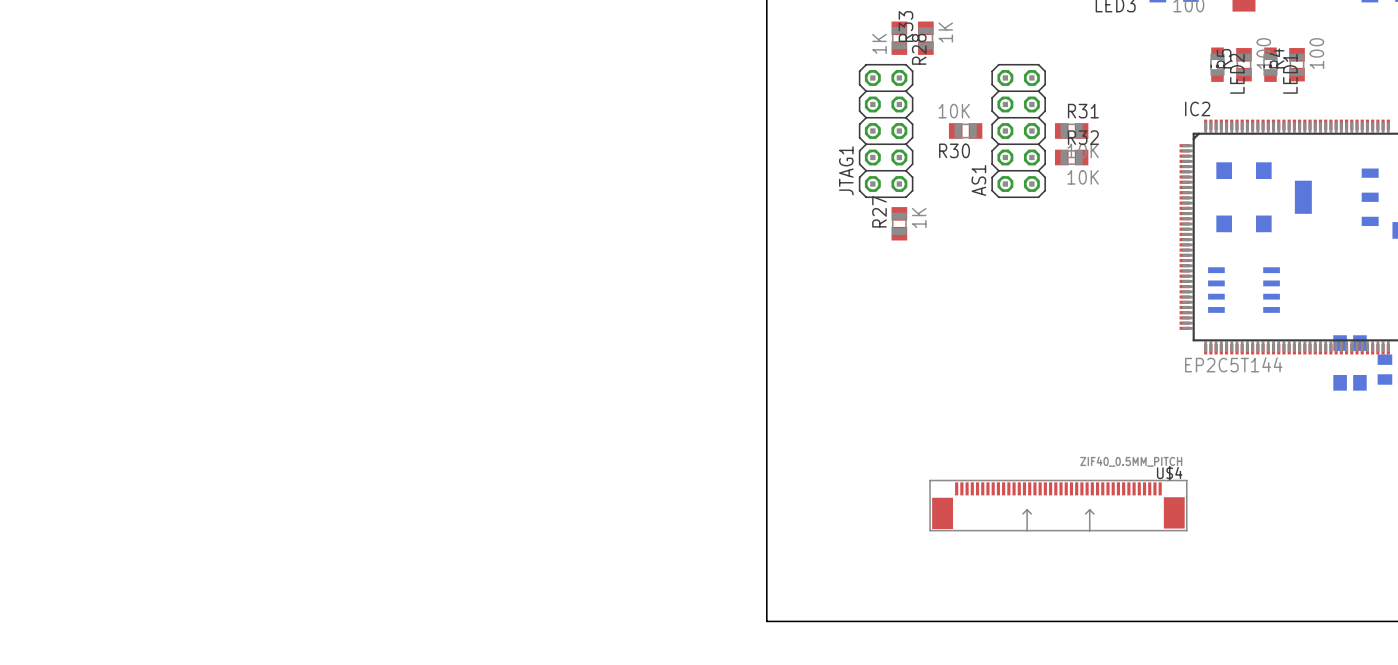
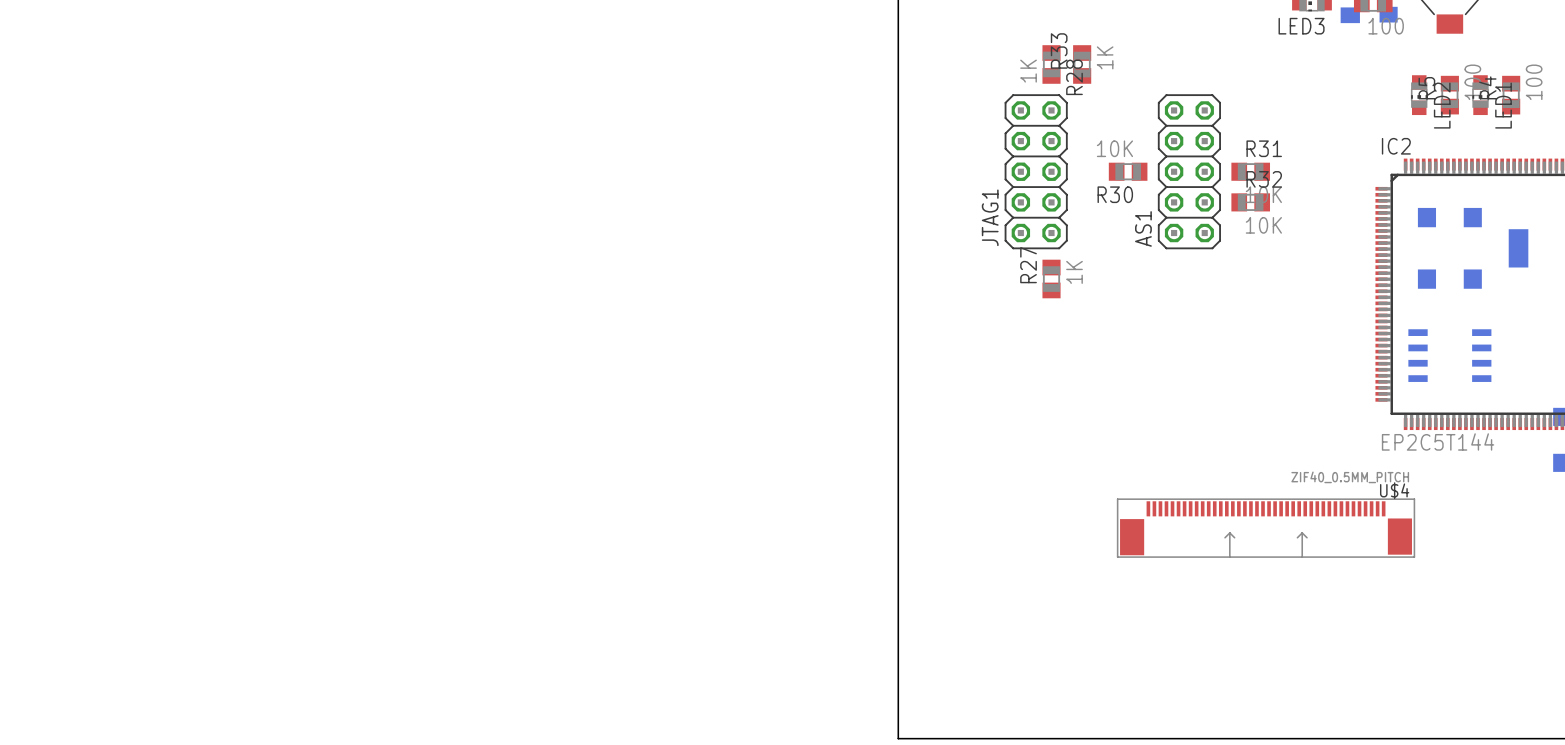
U$4 position: (1058, 505) -> (1266, 528)

